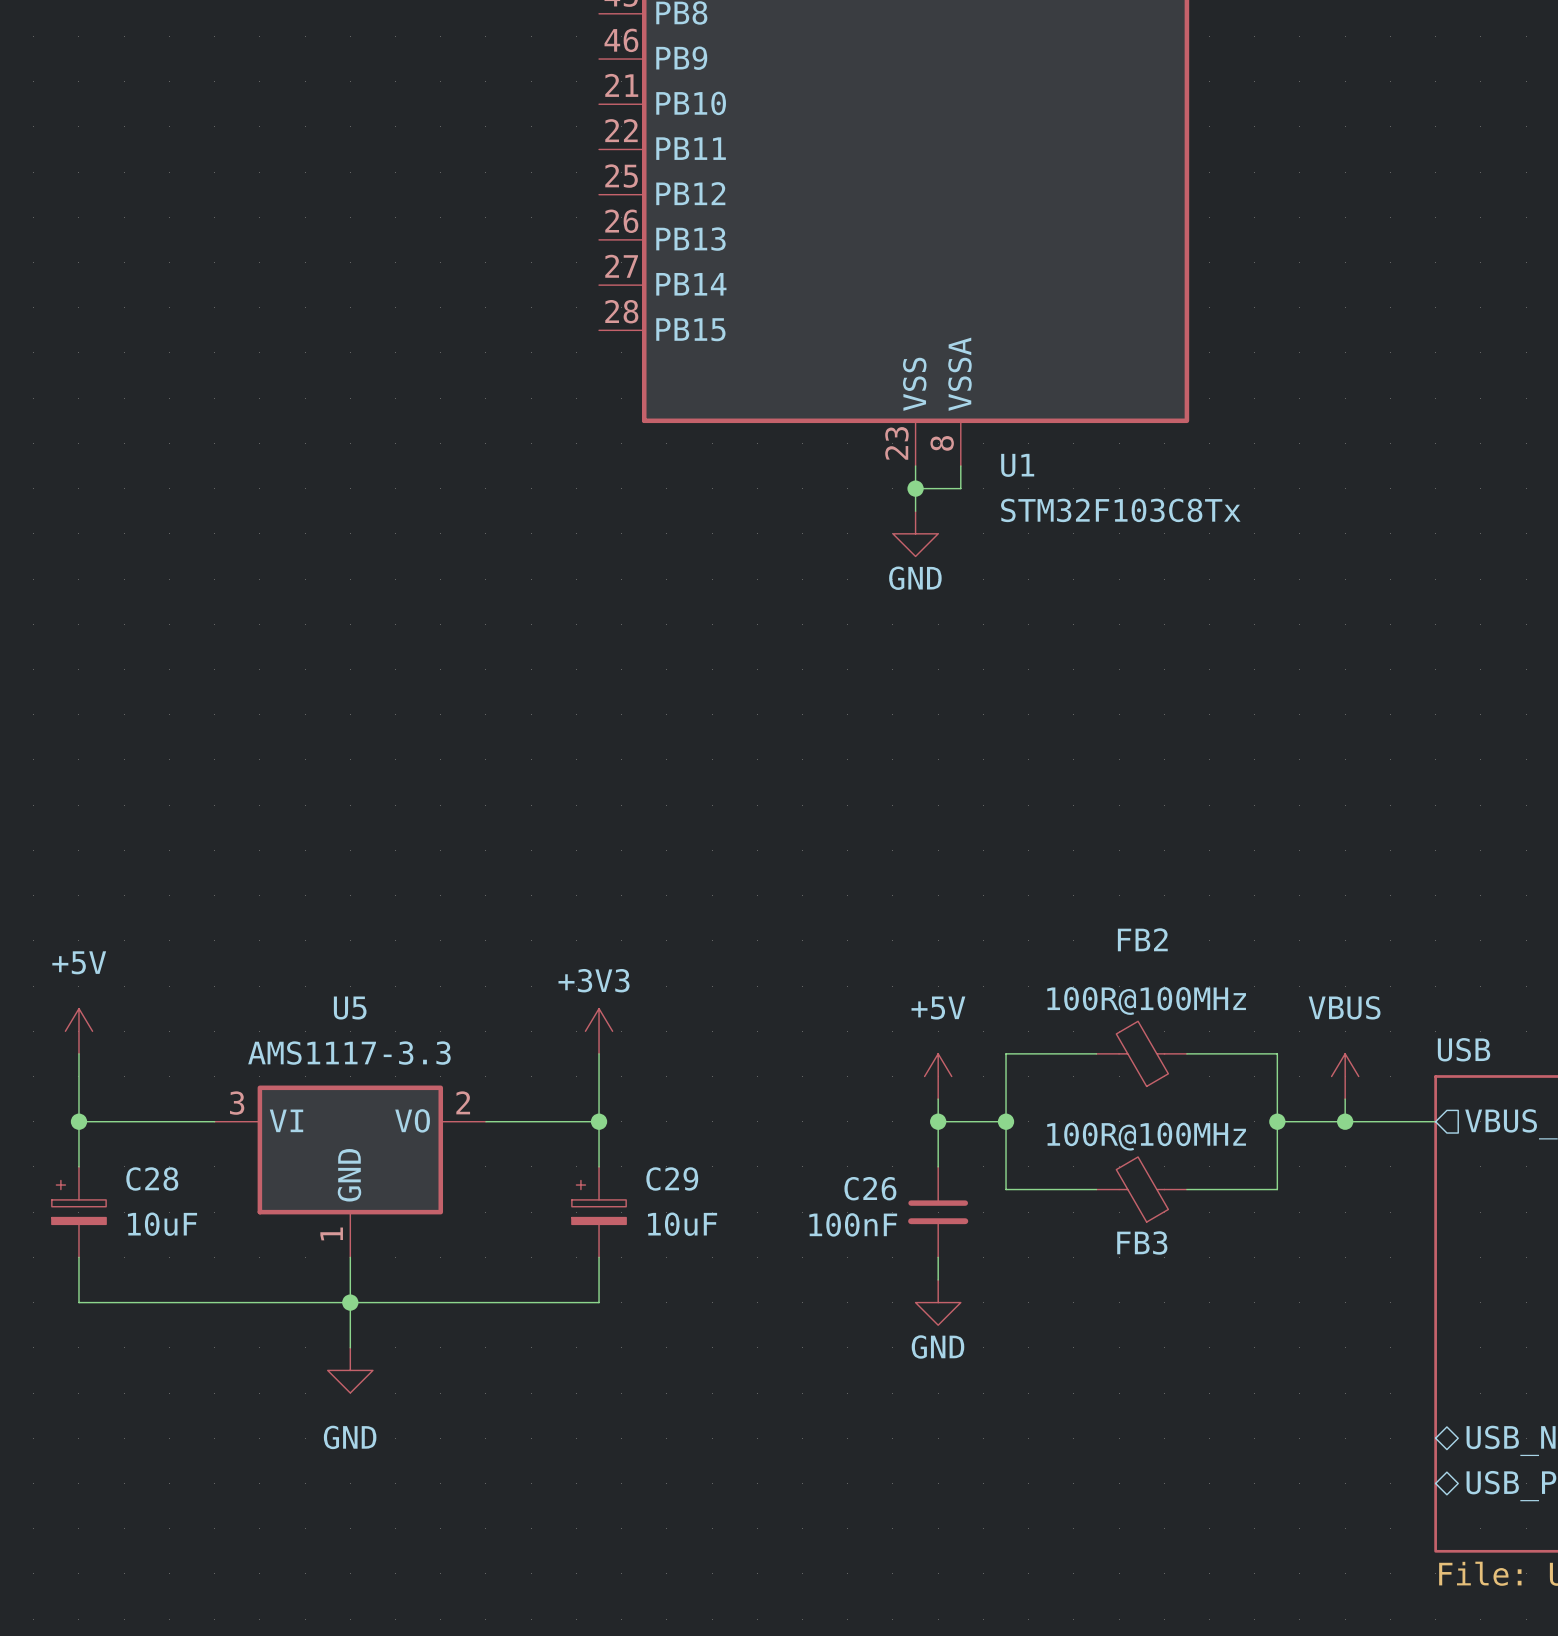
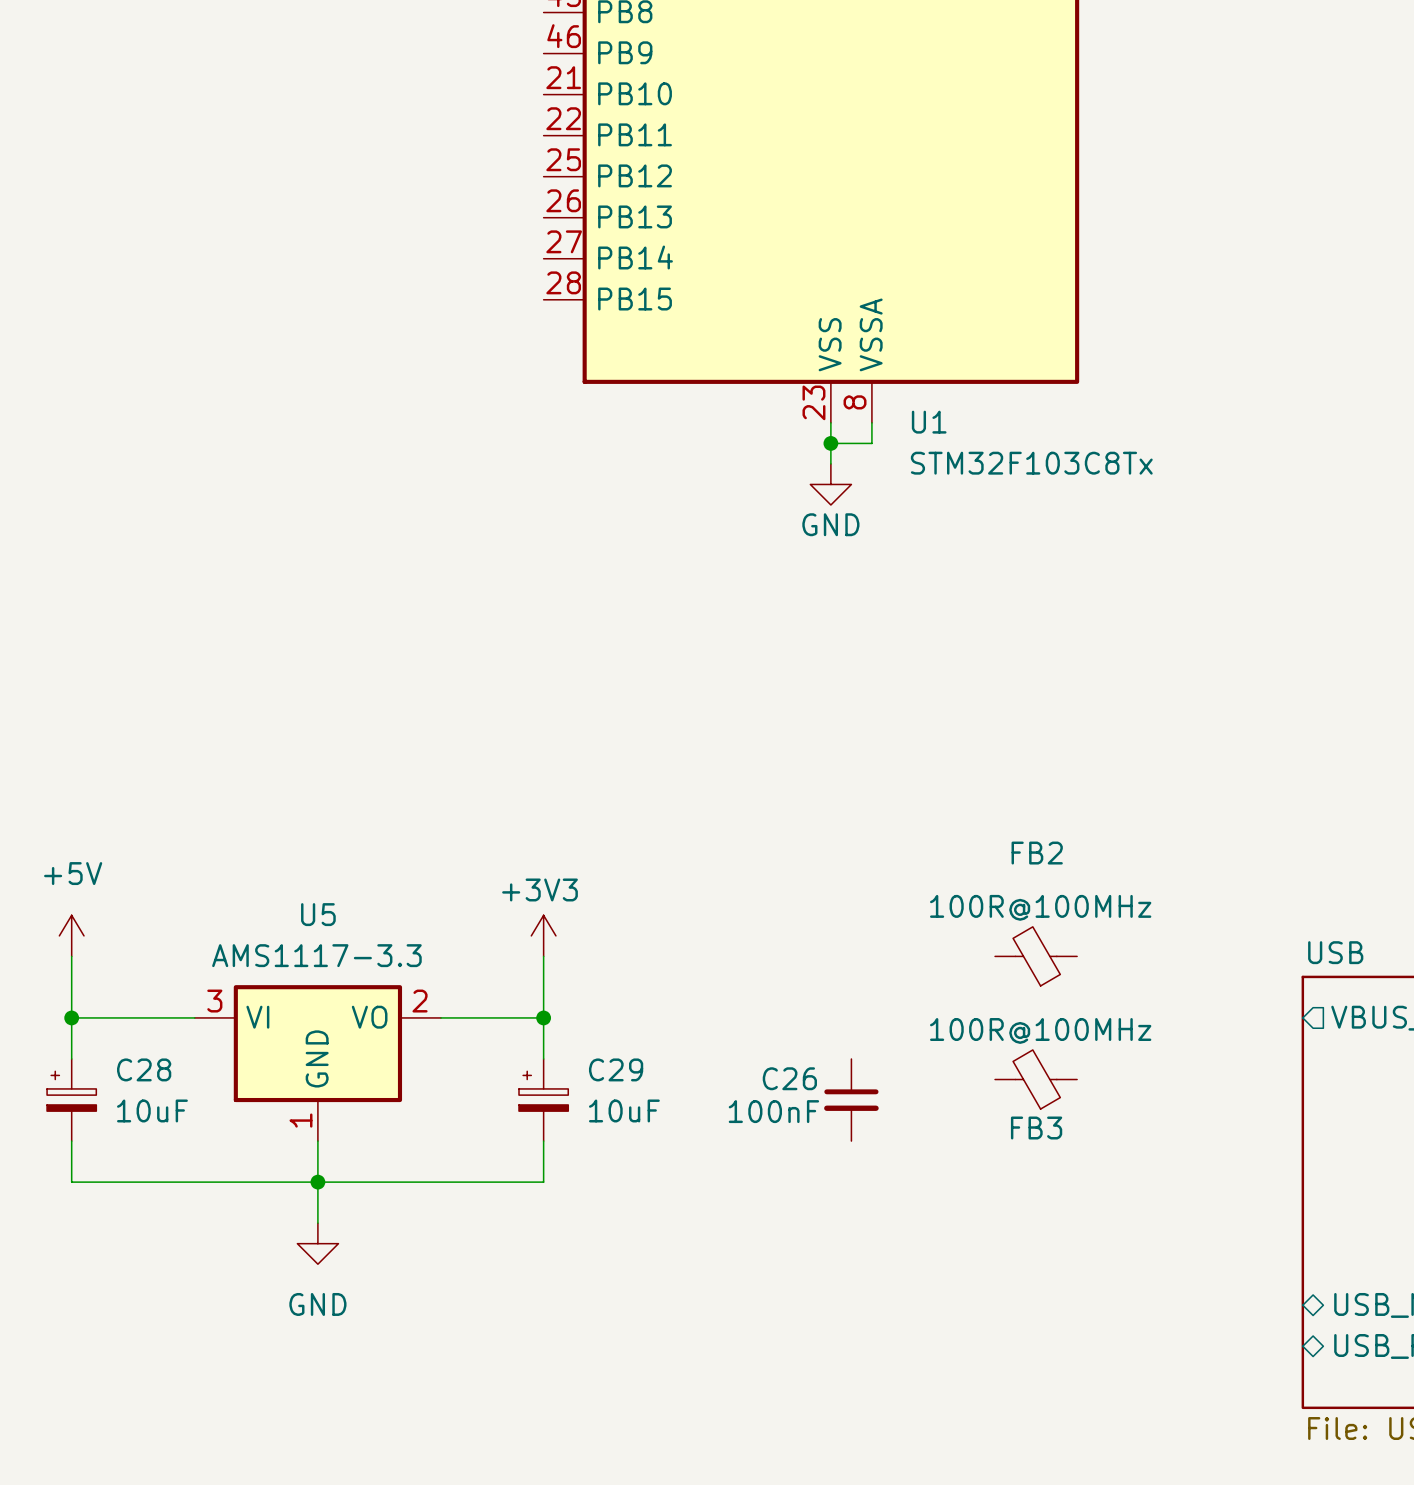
wire: (1096, 1053) (1006, 1053) (1006, 1189) (1096, 1189) -> none
wire: (1186, 1053) (1277, 1053) (1277, 1189) (1186, 1189) -> none
power symbol: +5V (938, 1076) -> none
power symbol: VBUS (1345, 1076) -> none
wire: (938, 1099) (938, 1166) -> none
wire: (1345, 1099) (1345, 1121) -> none
wire: (938, 1121) (1006, 1121) -> none
junction: (938, 1121) -> none
junction: (1006, 1121) -> none
wire: (1277, 1121) (1435, 1121) -> none
junction: (1277, 1121) -> none
junction: (1345, 1121) -> none
wire: (938, 1257) (938, 1279) -> none
power symbol: GND (938, 1302) -> none

